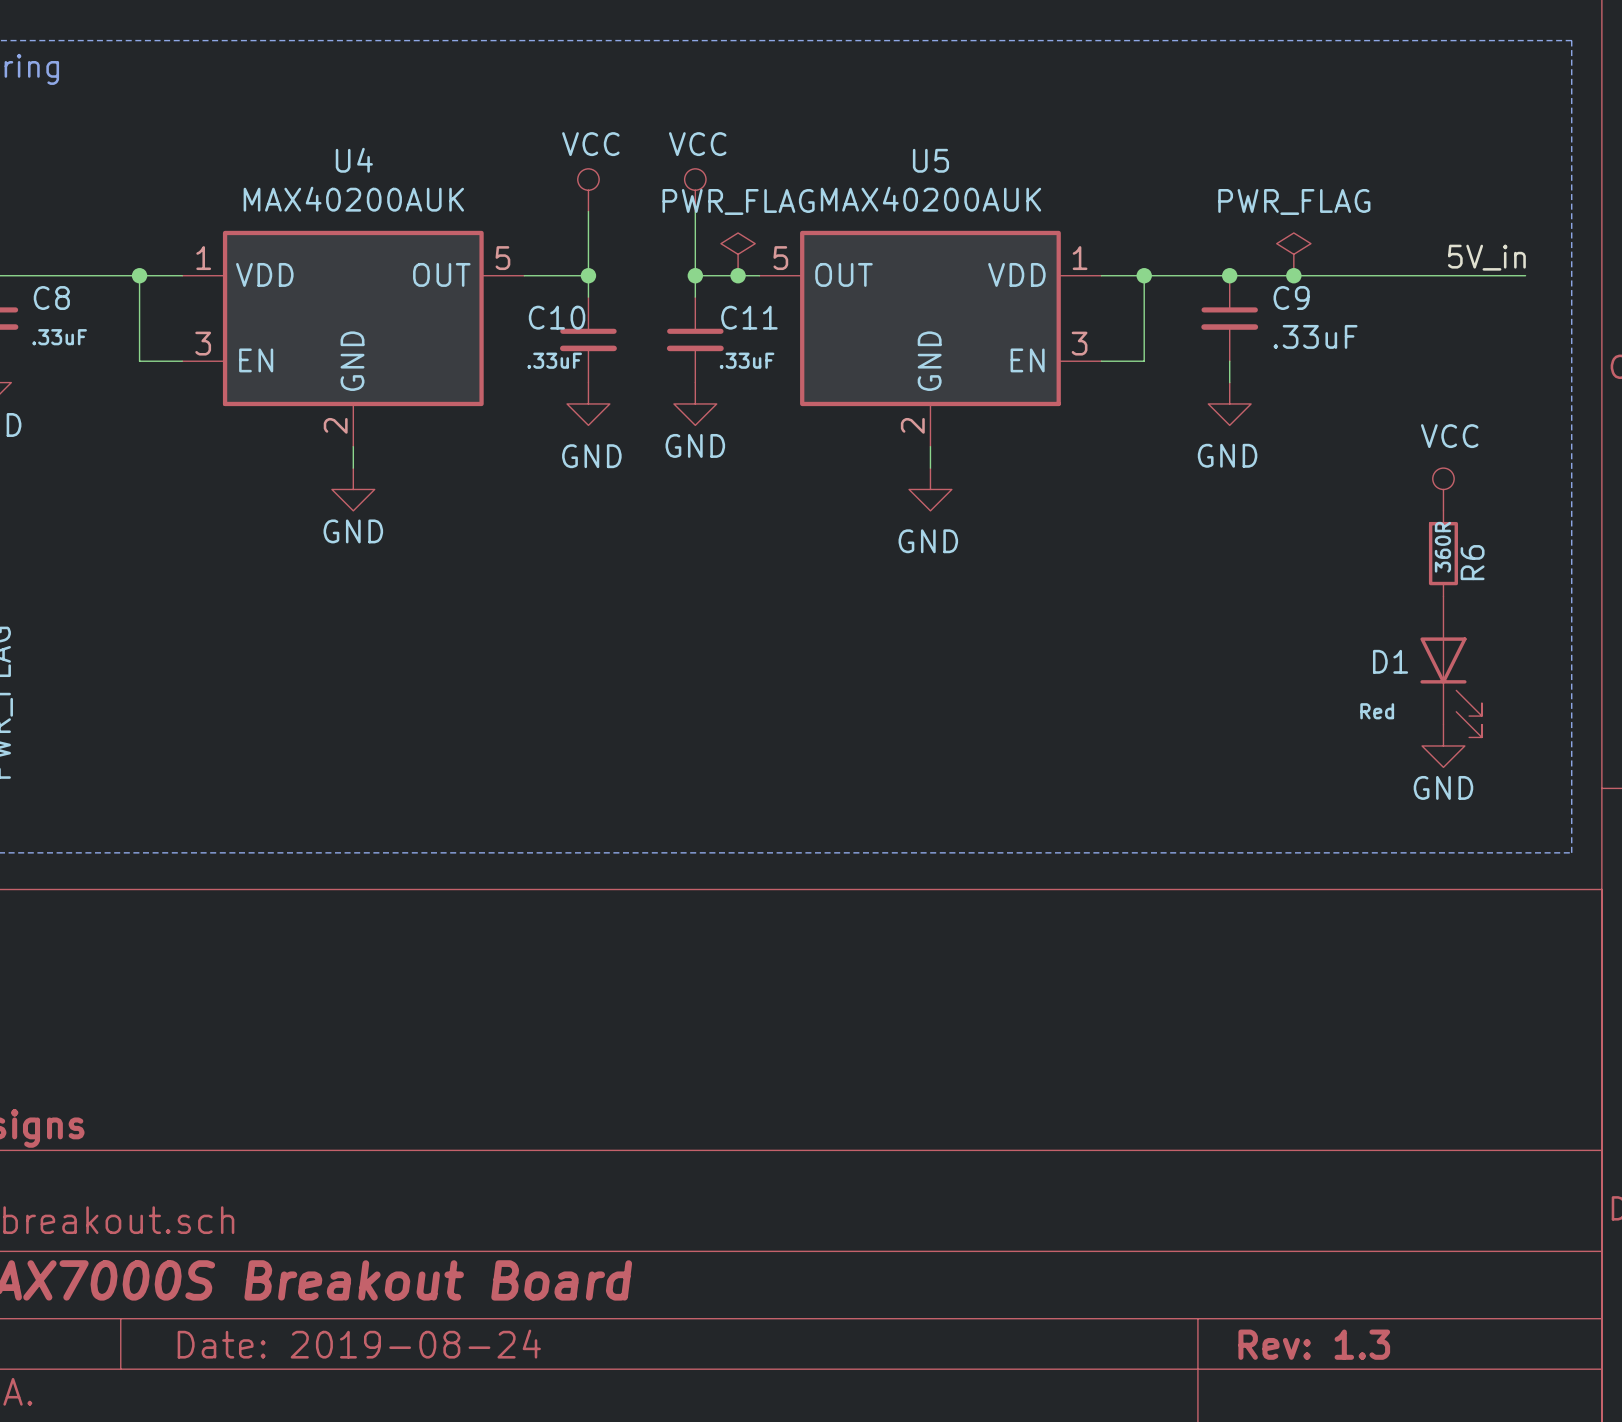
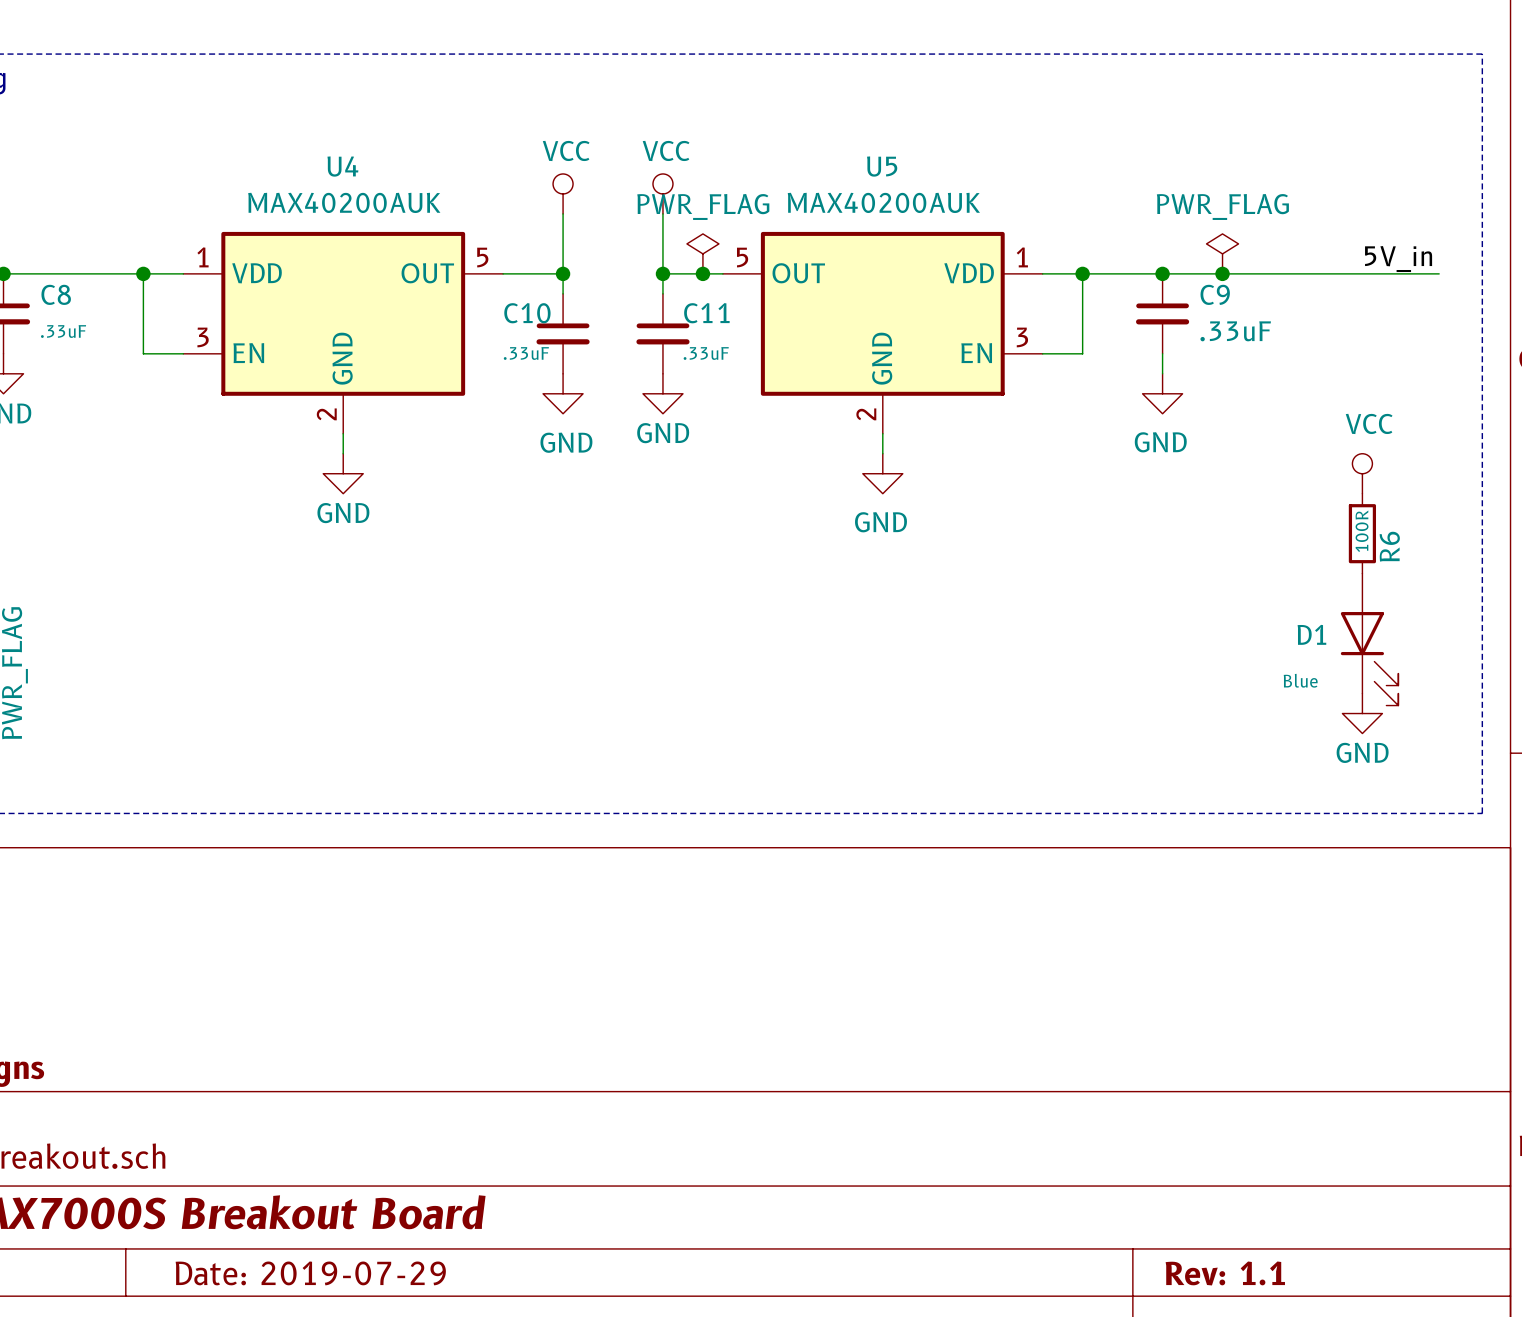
R6 value: 360R (1442, 547) -> 100R (1362, 531)
D1 value: Red (1377, 711) -> Blue (1300, 680)
title block: Date: 2019-08-24 (359, 1344) -> Date: 2019-07-29 (310, 1273)
title block: Rev: 1.3 (1314, 1344) -> Rev: 1.1 (1225, 1273)

